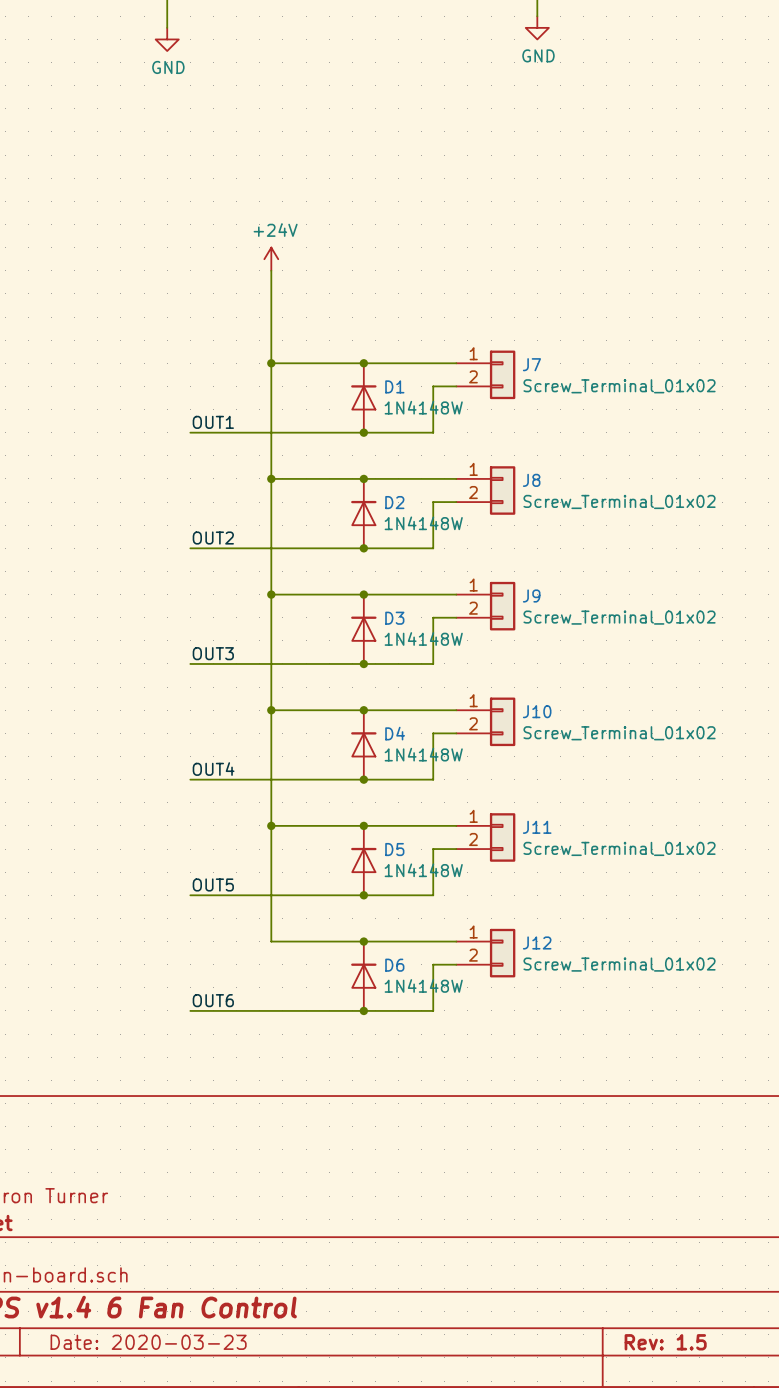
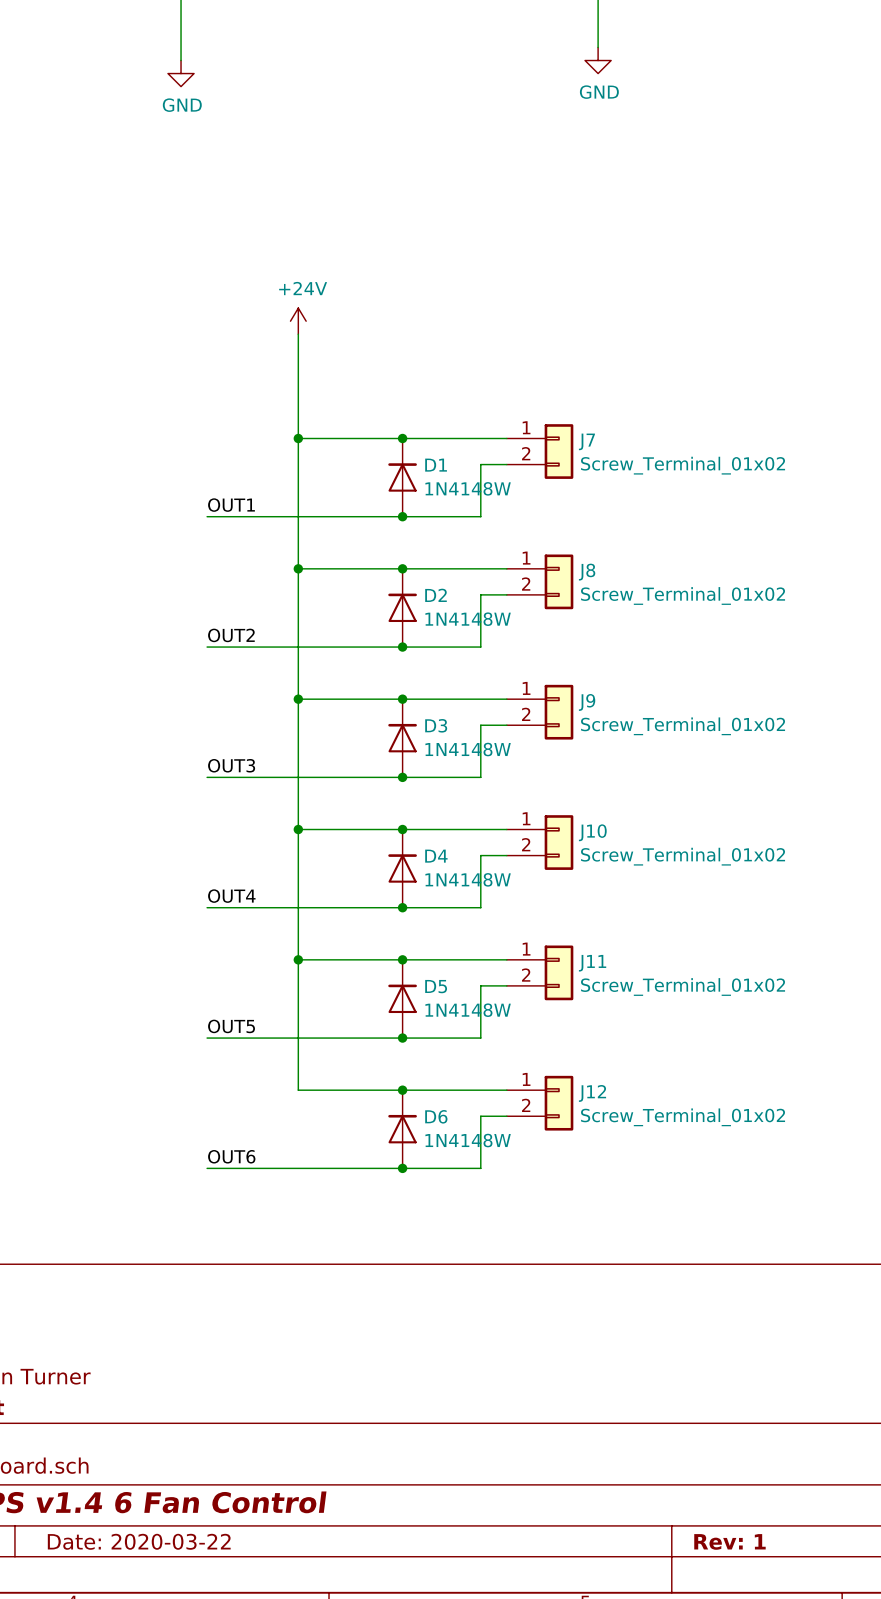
title block: Date: 2020-03-23 (148, 1342) -> Date: 2020-03-22 (139, 1541)
title block: Rev: 1.5 (665, 1342) -> Rev: 1 (729, 1541)

